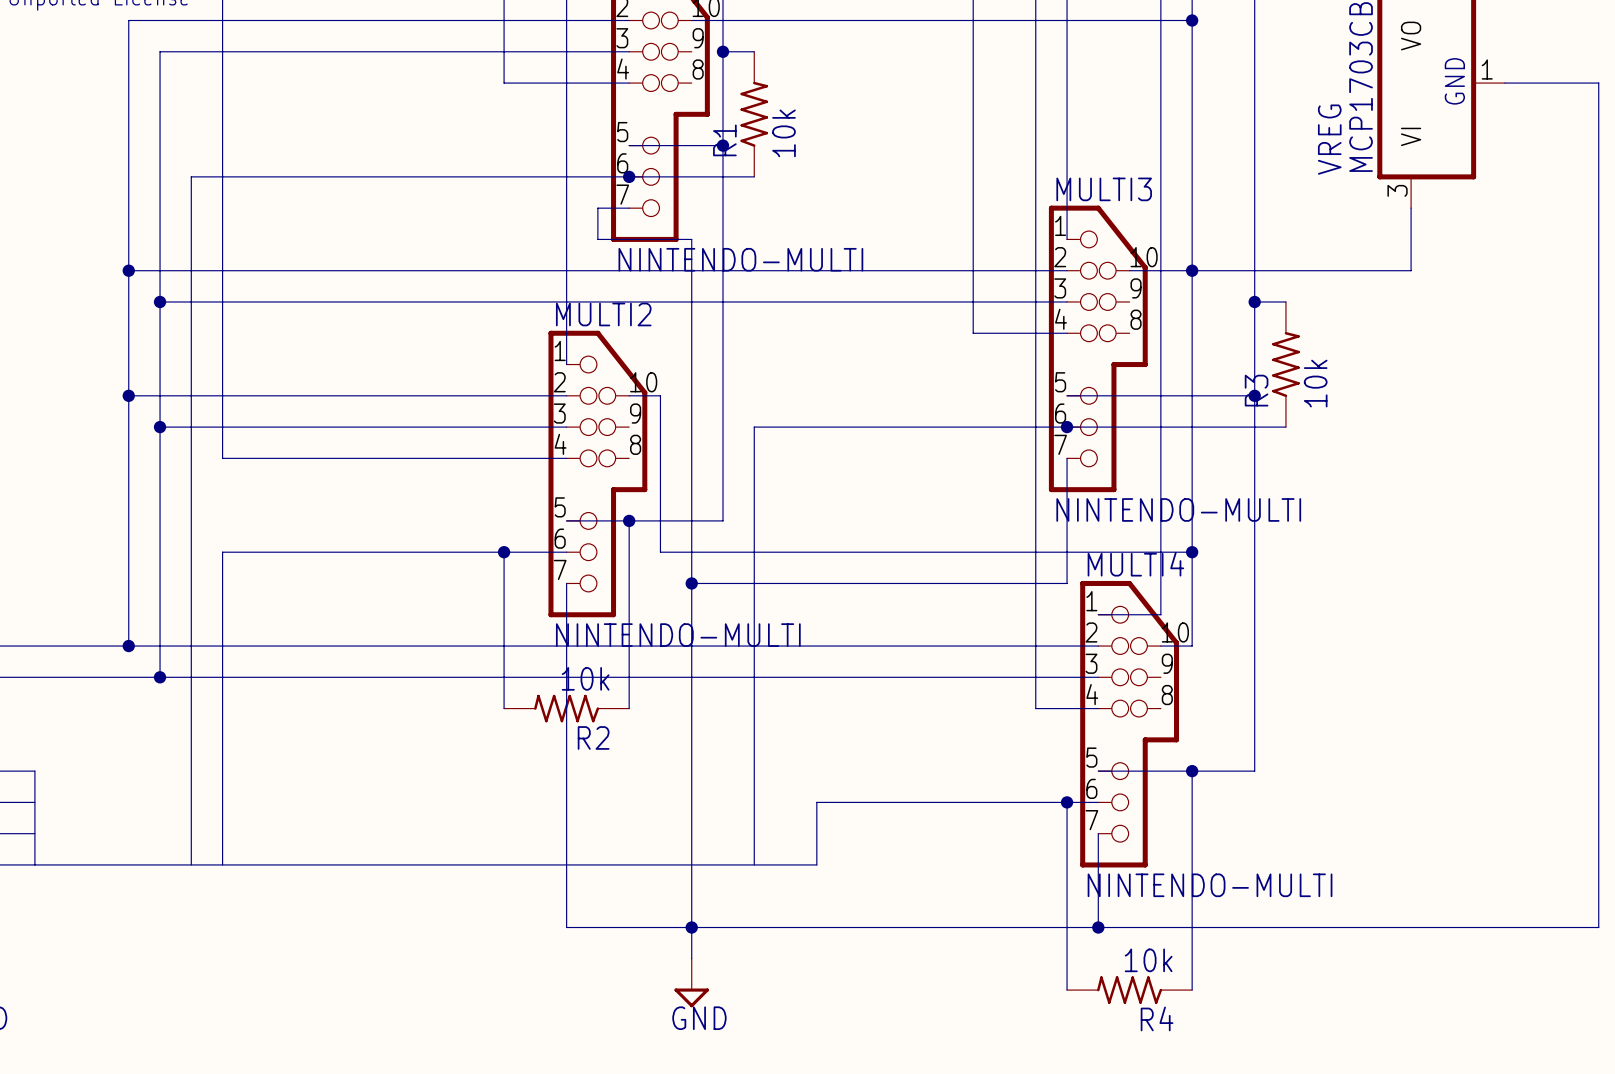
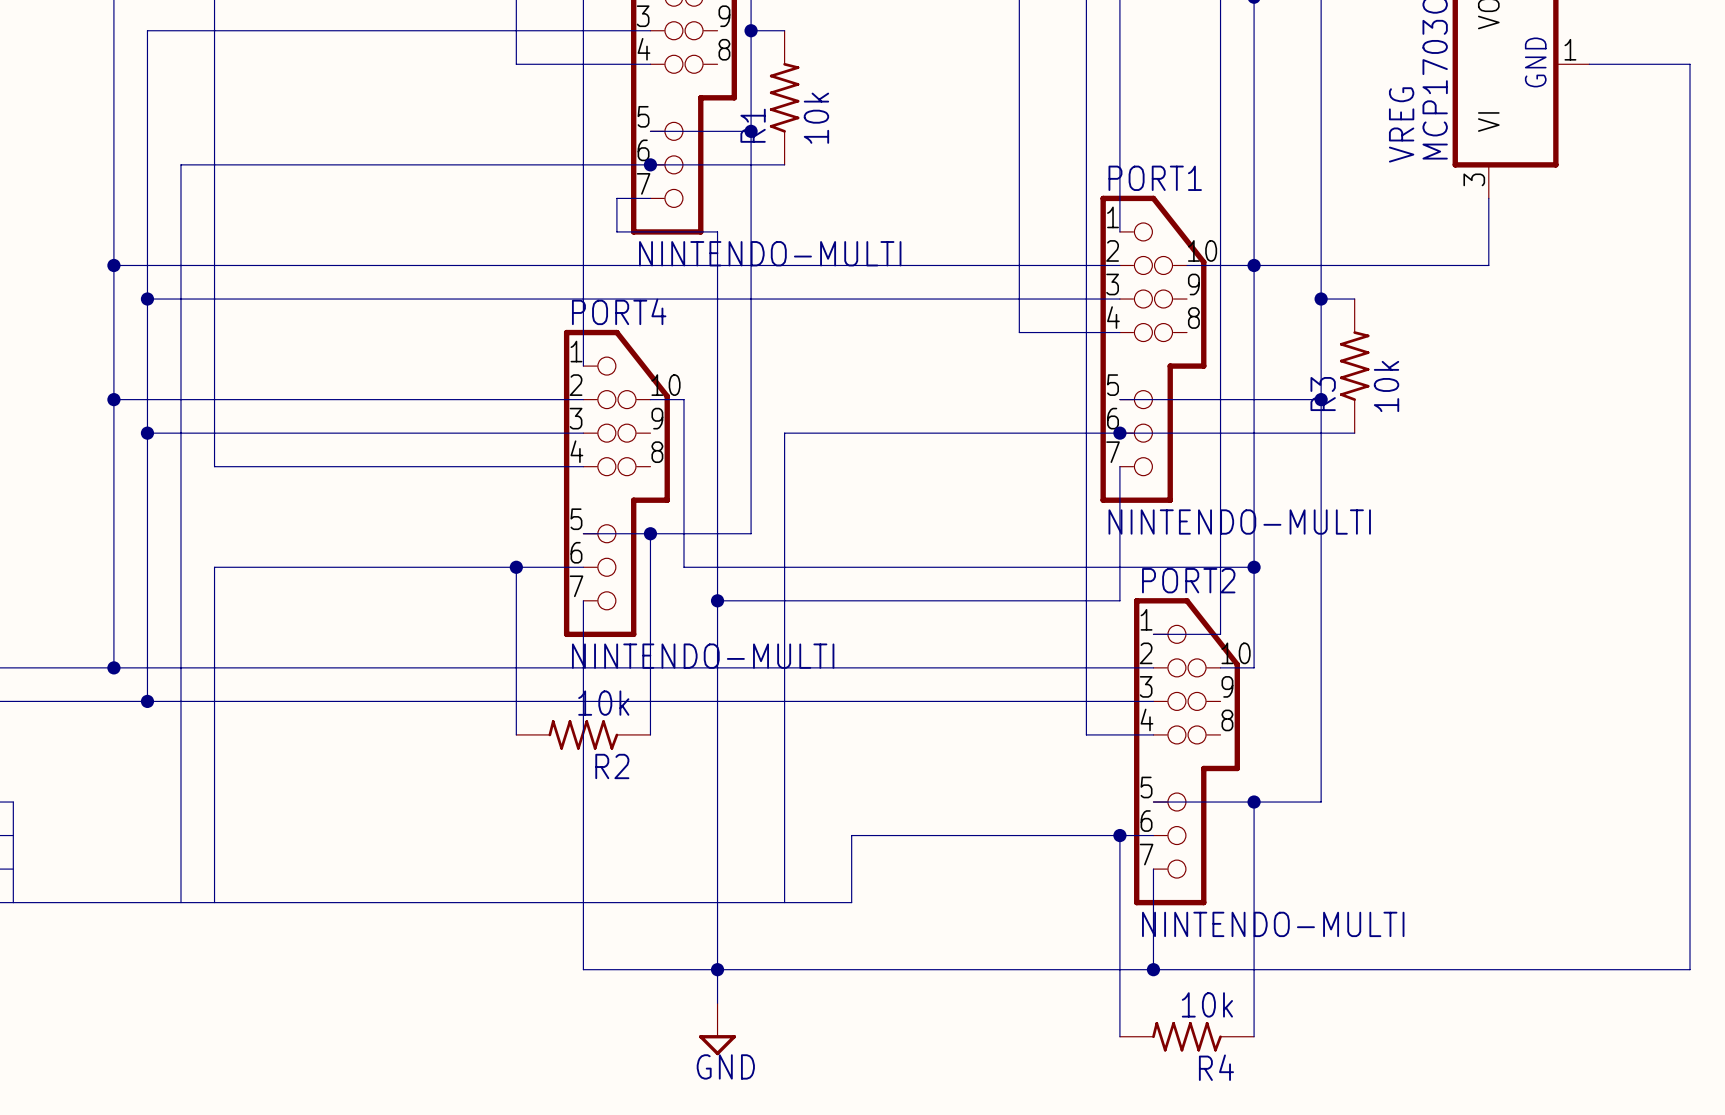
MULTI3 name: MULTI3 (1104, 189) -> PORT1 (1155, 178)
MULTI2 name: MULTI2 (603, 314) -> PORT4 (619, 311)
MULTI4 name: MULTI4 (1135, 564) -> PORT2 (1188, 580)

